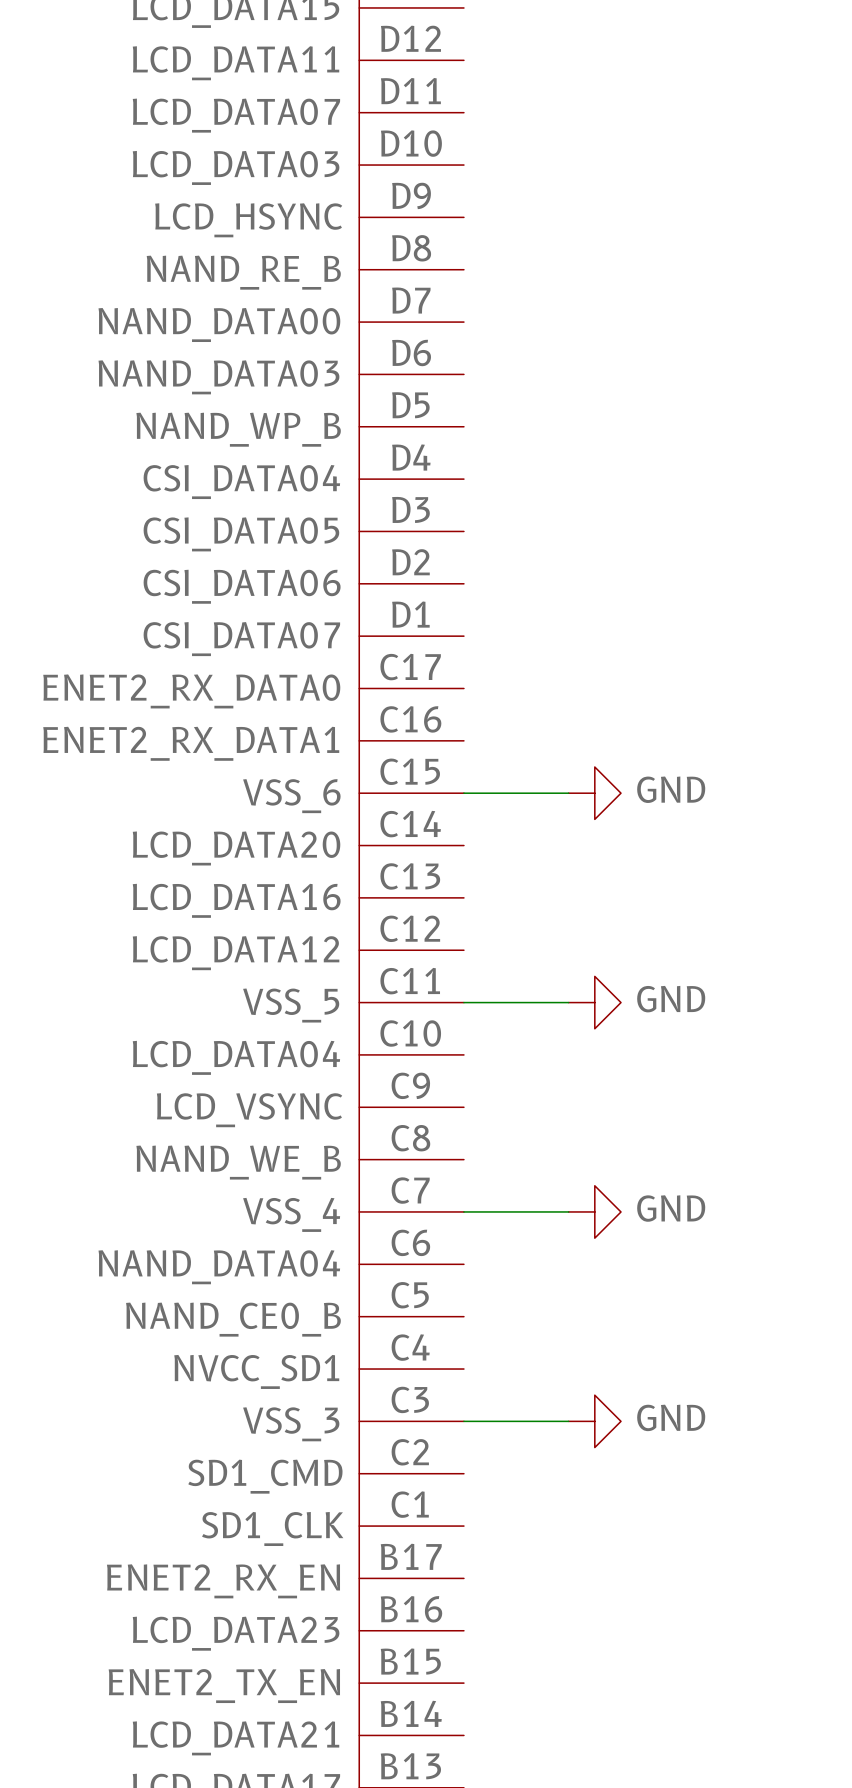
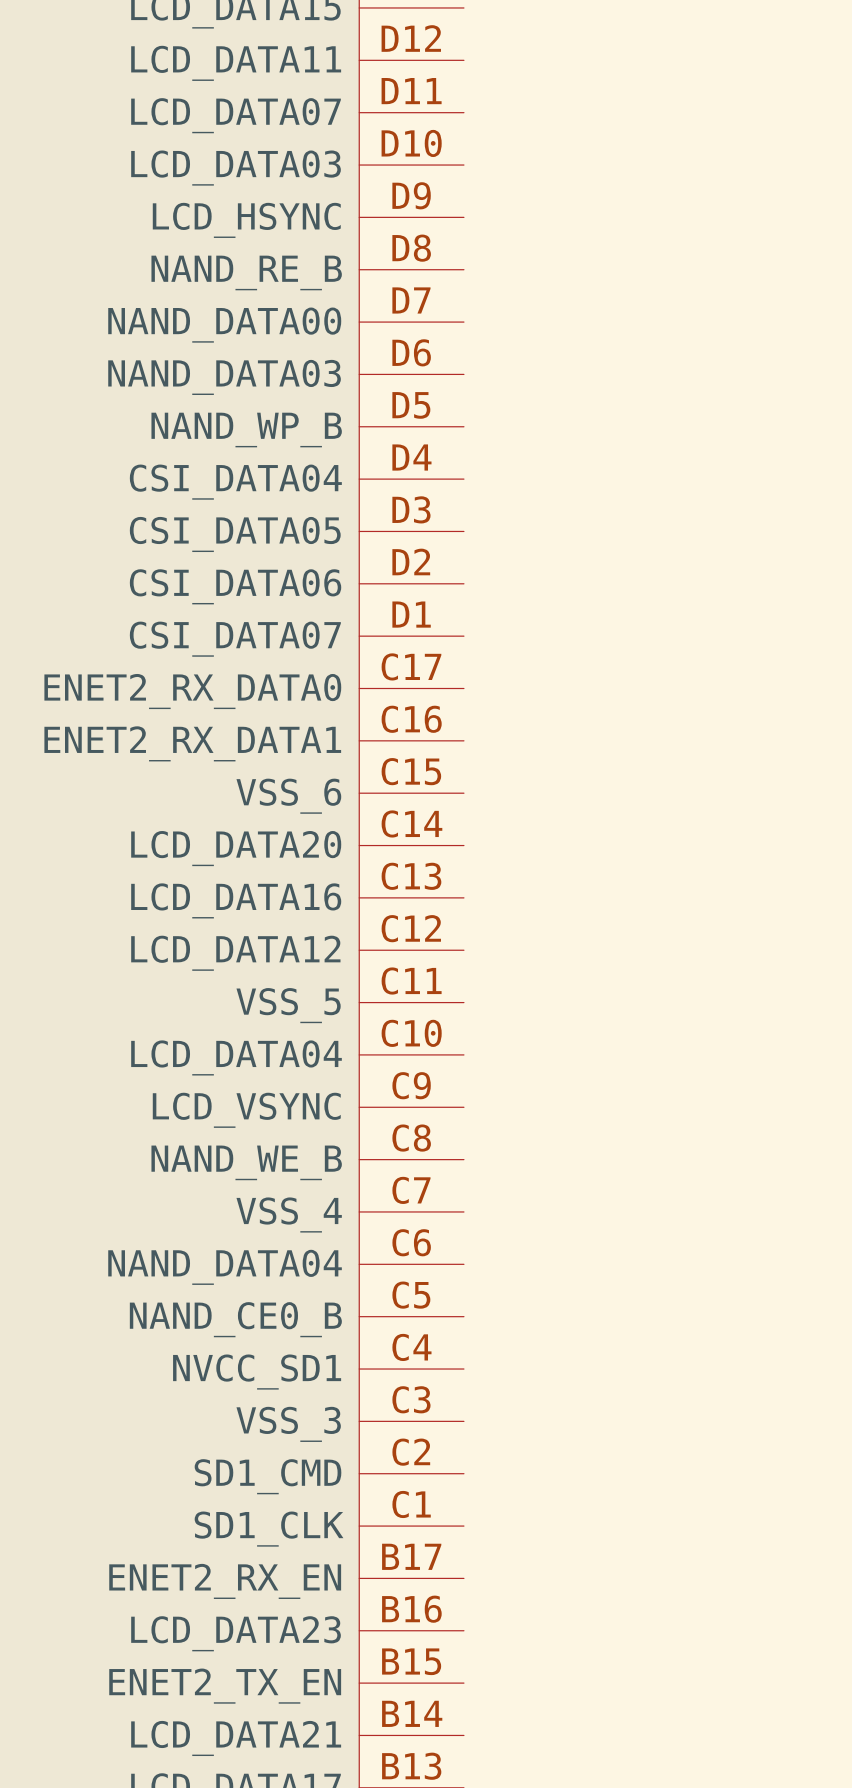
wire: (463, 793) (568, 793) -> none
power symbol: GND (594, 793) -> none
wire: (463, 1002) (568, 1002) -> none
power symbol: GND (594, 1002) -> none
wire: (463, 1211) (568, 1211) -> none
power symbol: GND (594, 1211) -> none
wire: (463, 1421) (568, 1421) -> none
power symbol: GND (594, 1421) -> none

